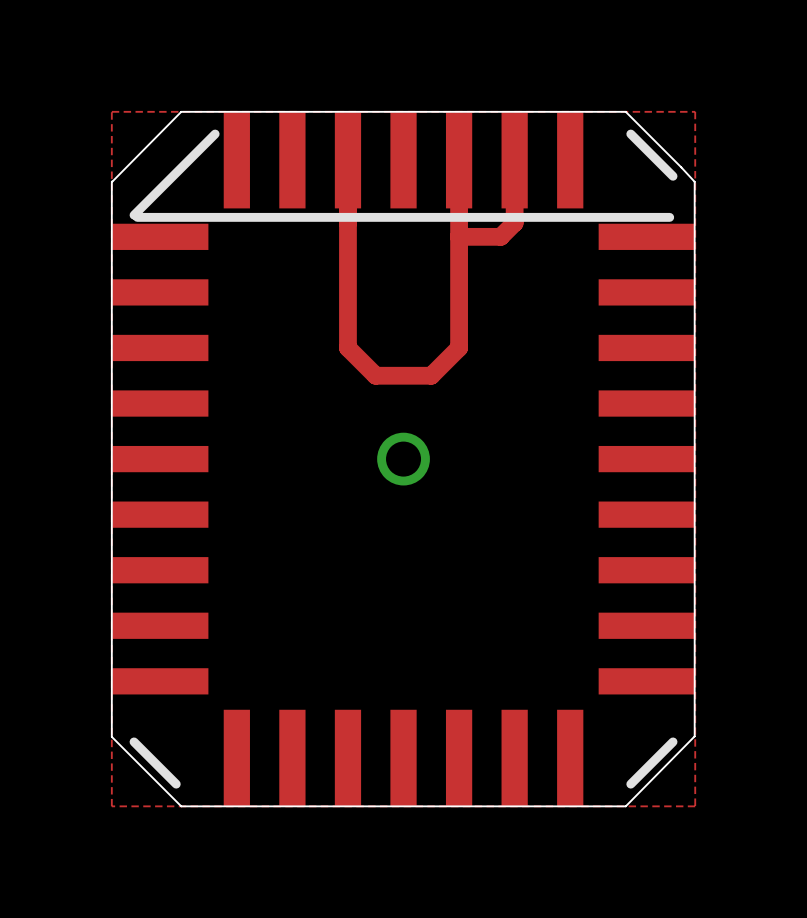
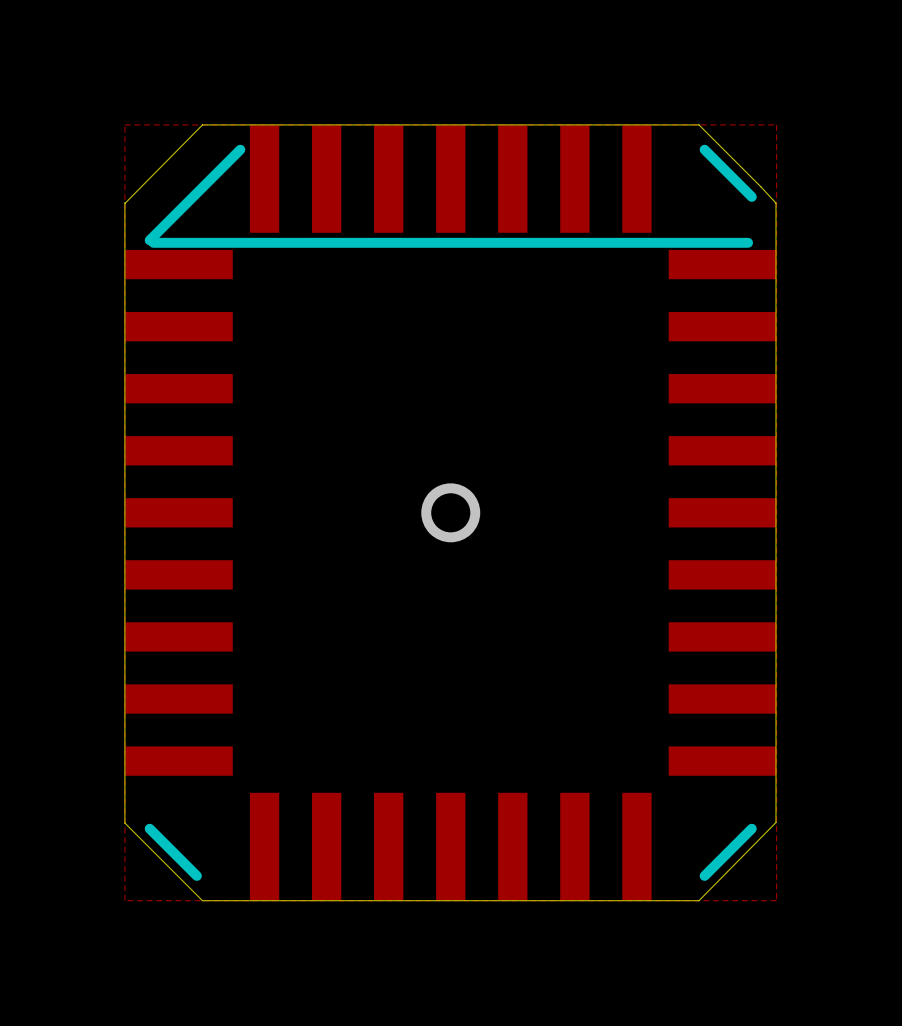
track: (347, 160) (347, 347) (375, 375) (431, 375) (459, 347) (459, 160) -> none
track: (514, 160) (514, 222) (500, 236) (459, 236) -> none

